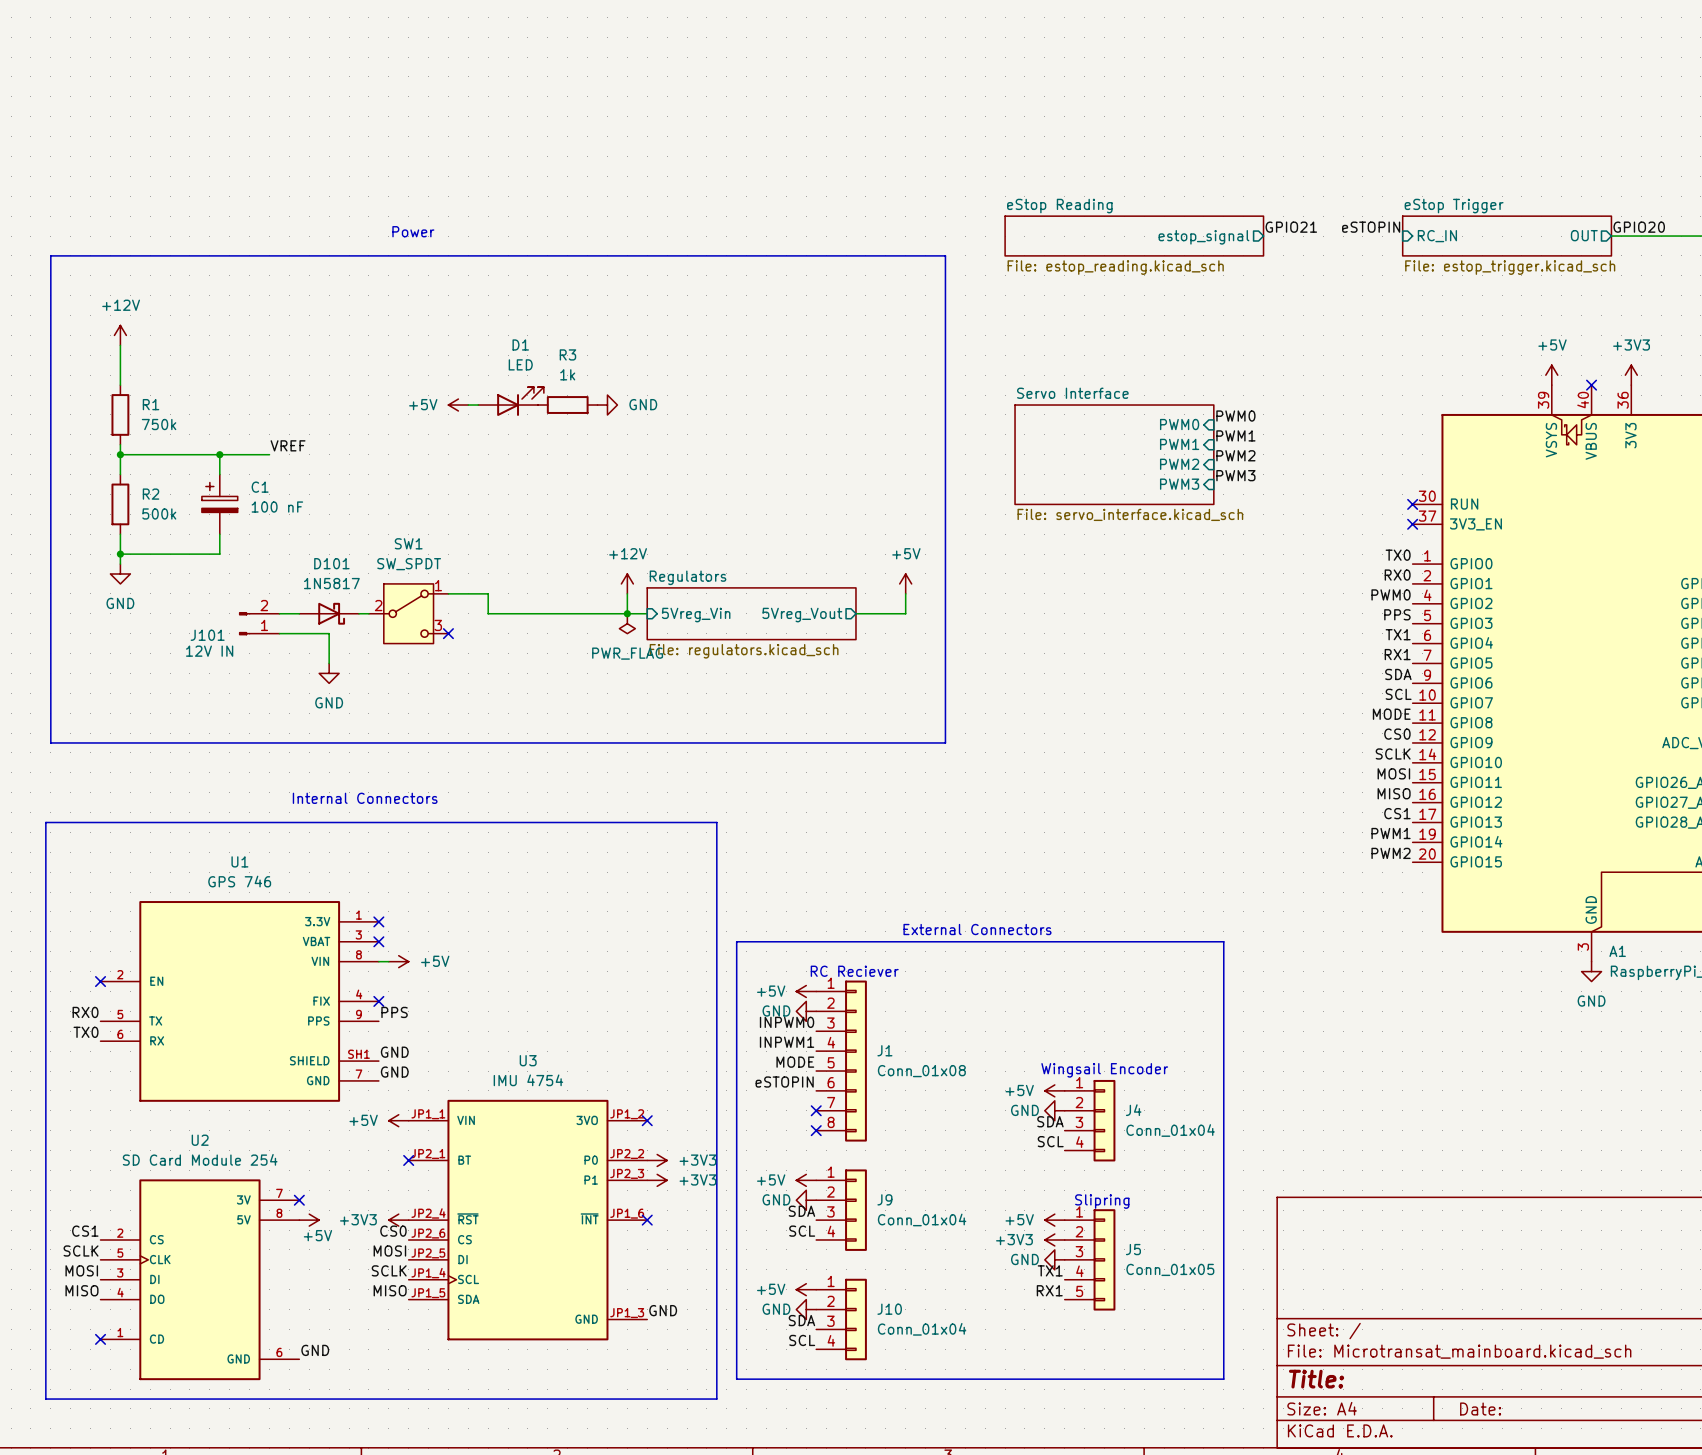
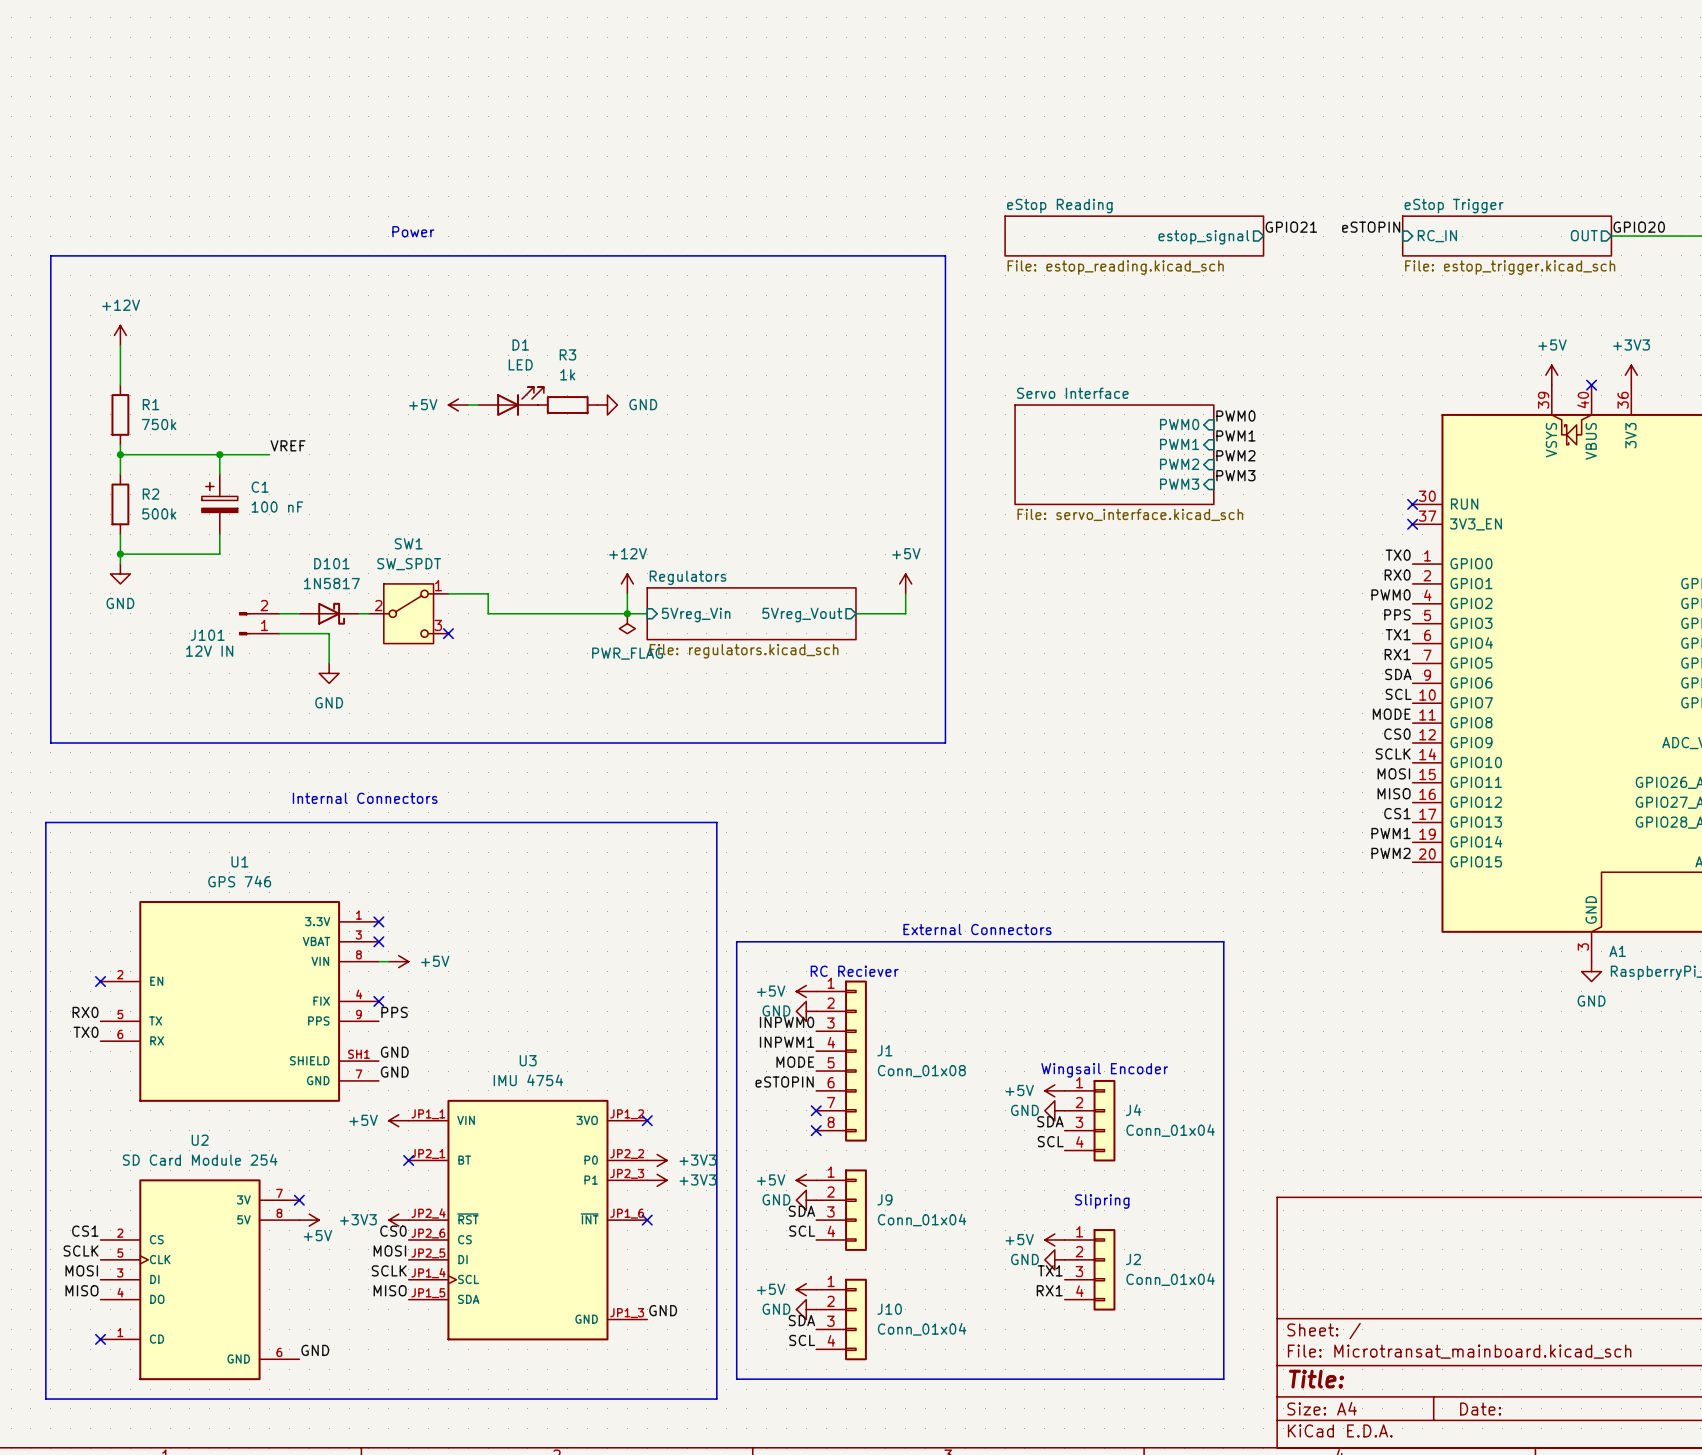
power symbol: +5V (1054, 1220) -> none
power symbol: +3V3 (1054, 1239) -> +5V (1054, 1239)
J5: Conn_01x05 (1090, 1259) -> none
J2: none -> Conn_01x04 (1090, 1269)

